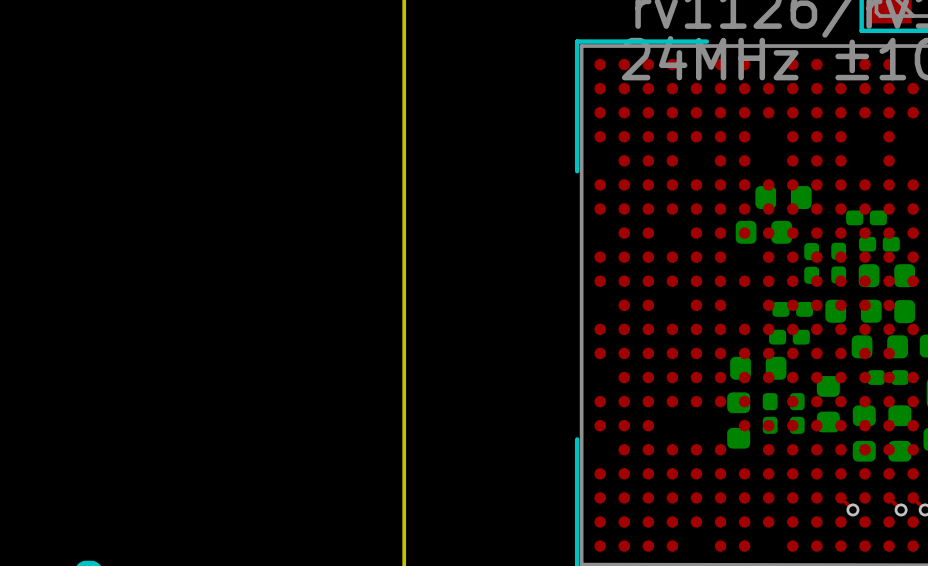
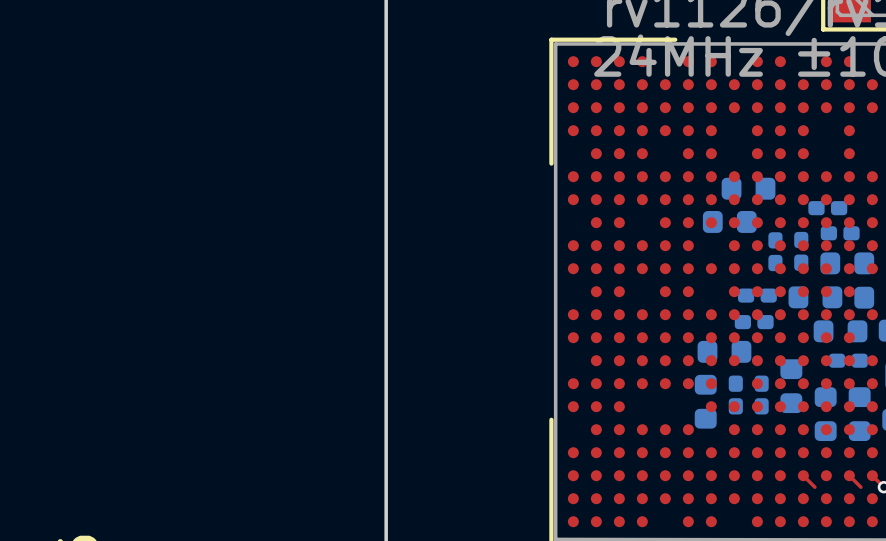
via: (852, 509) -> none
via: (901, 509) -> none

